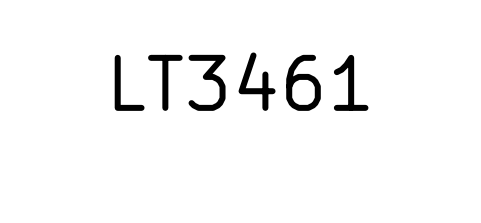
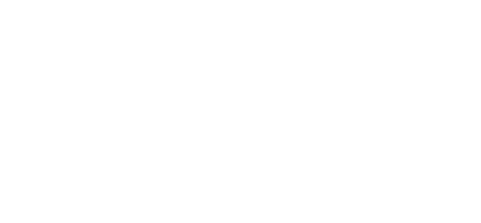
text: LT3461 (241, 81) -> none

